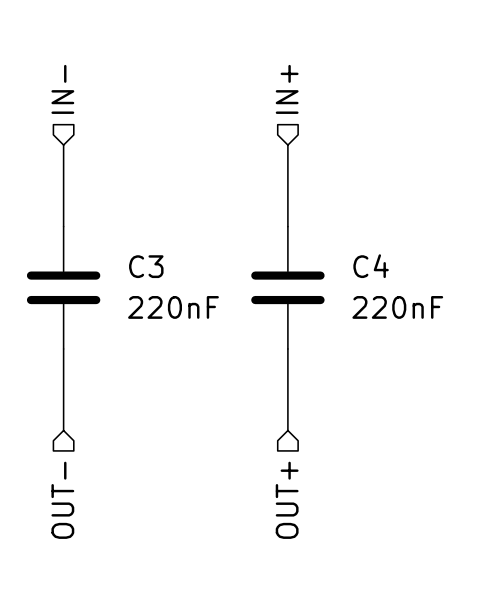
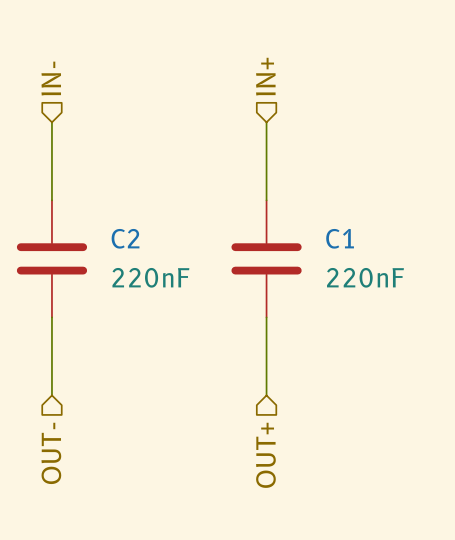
C3 name: C3 (146, 266) -> C2 (125, 238)
C4 name: C4 (371, 266) -> C1 (340, 238)

